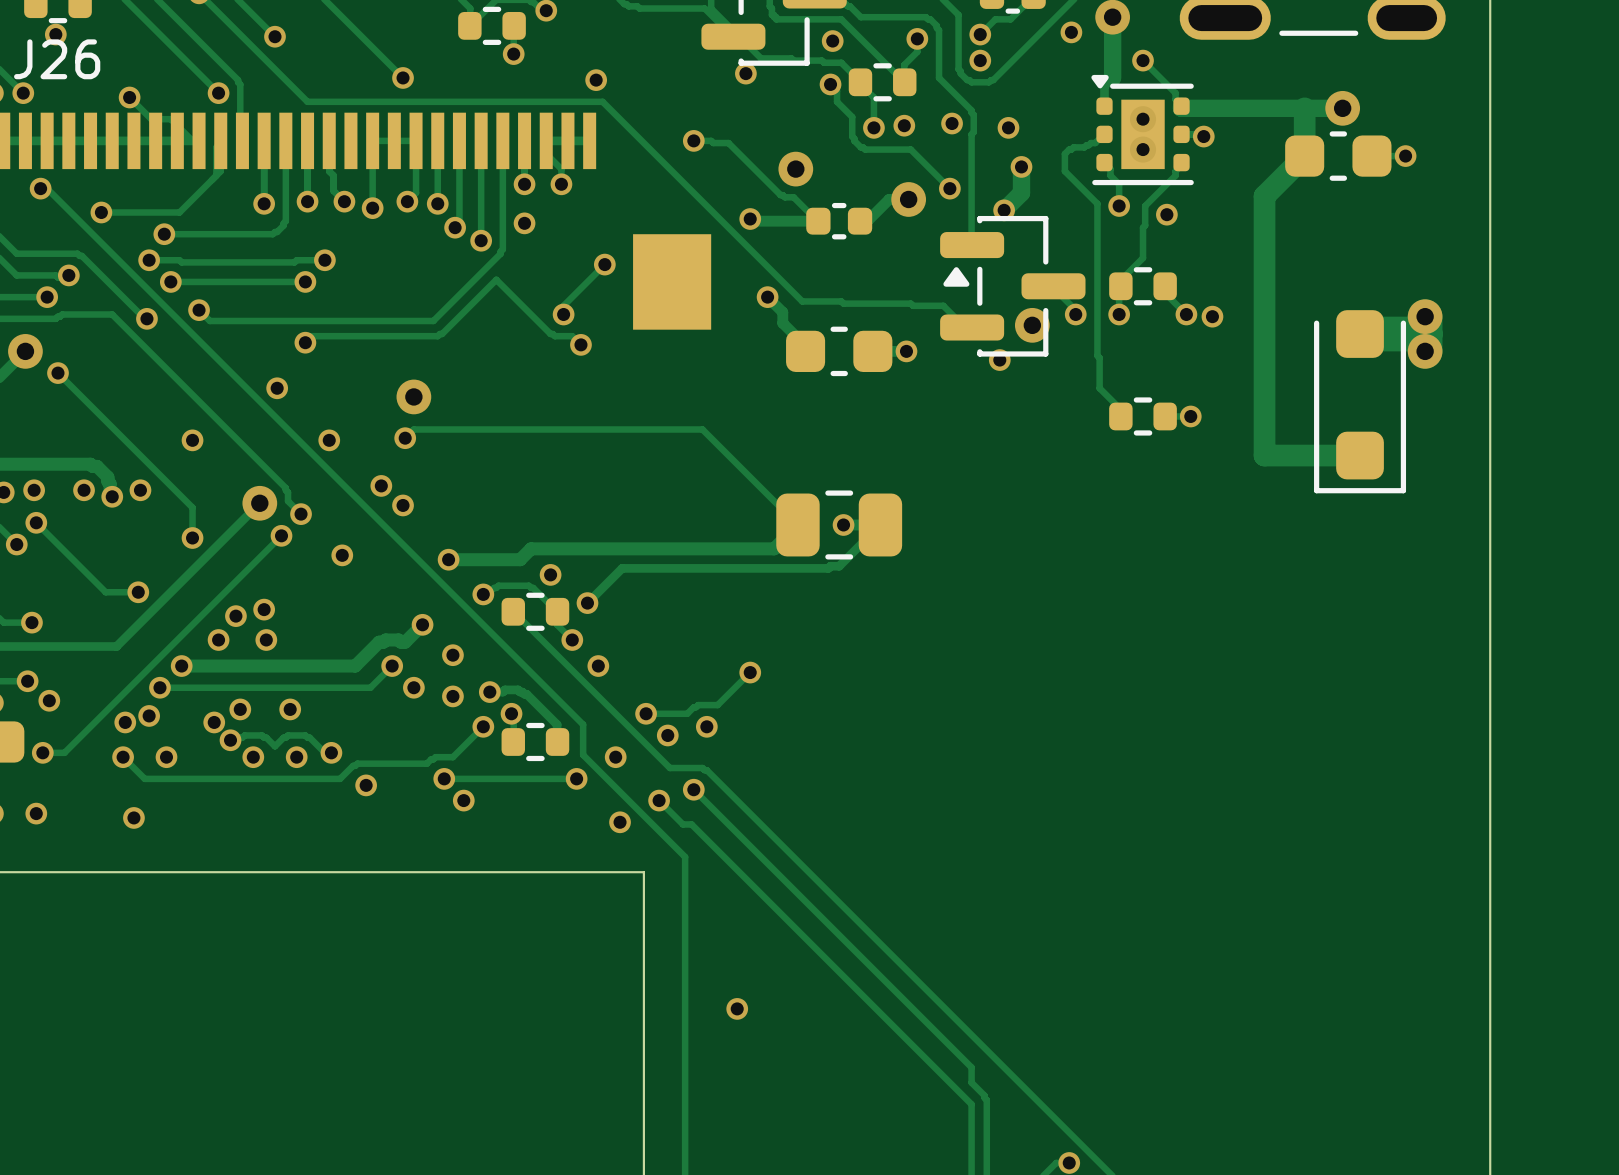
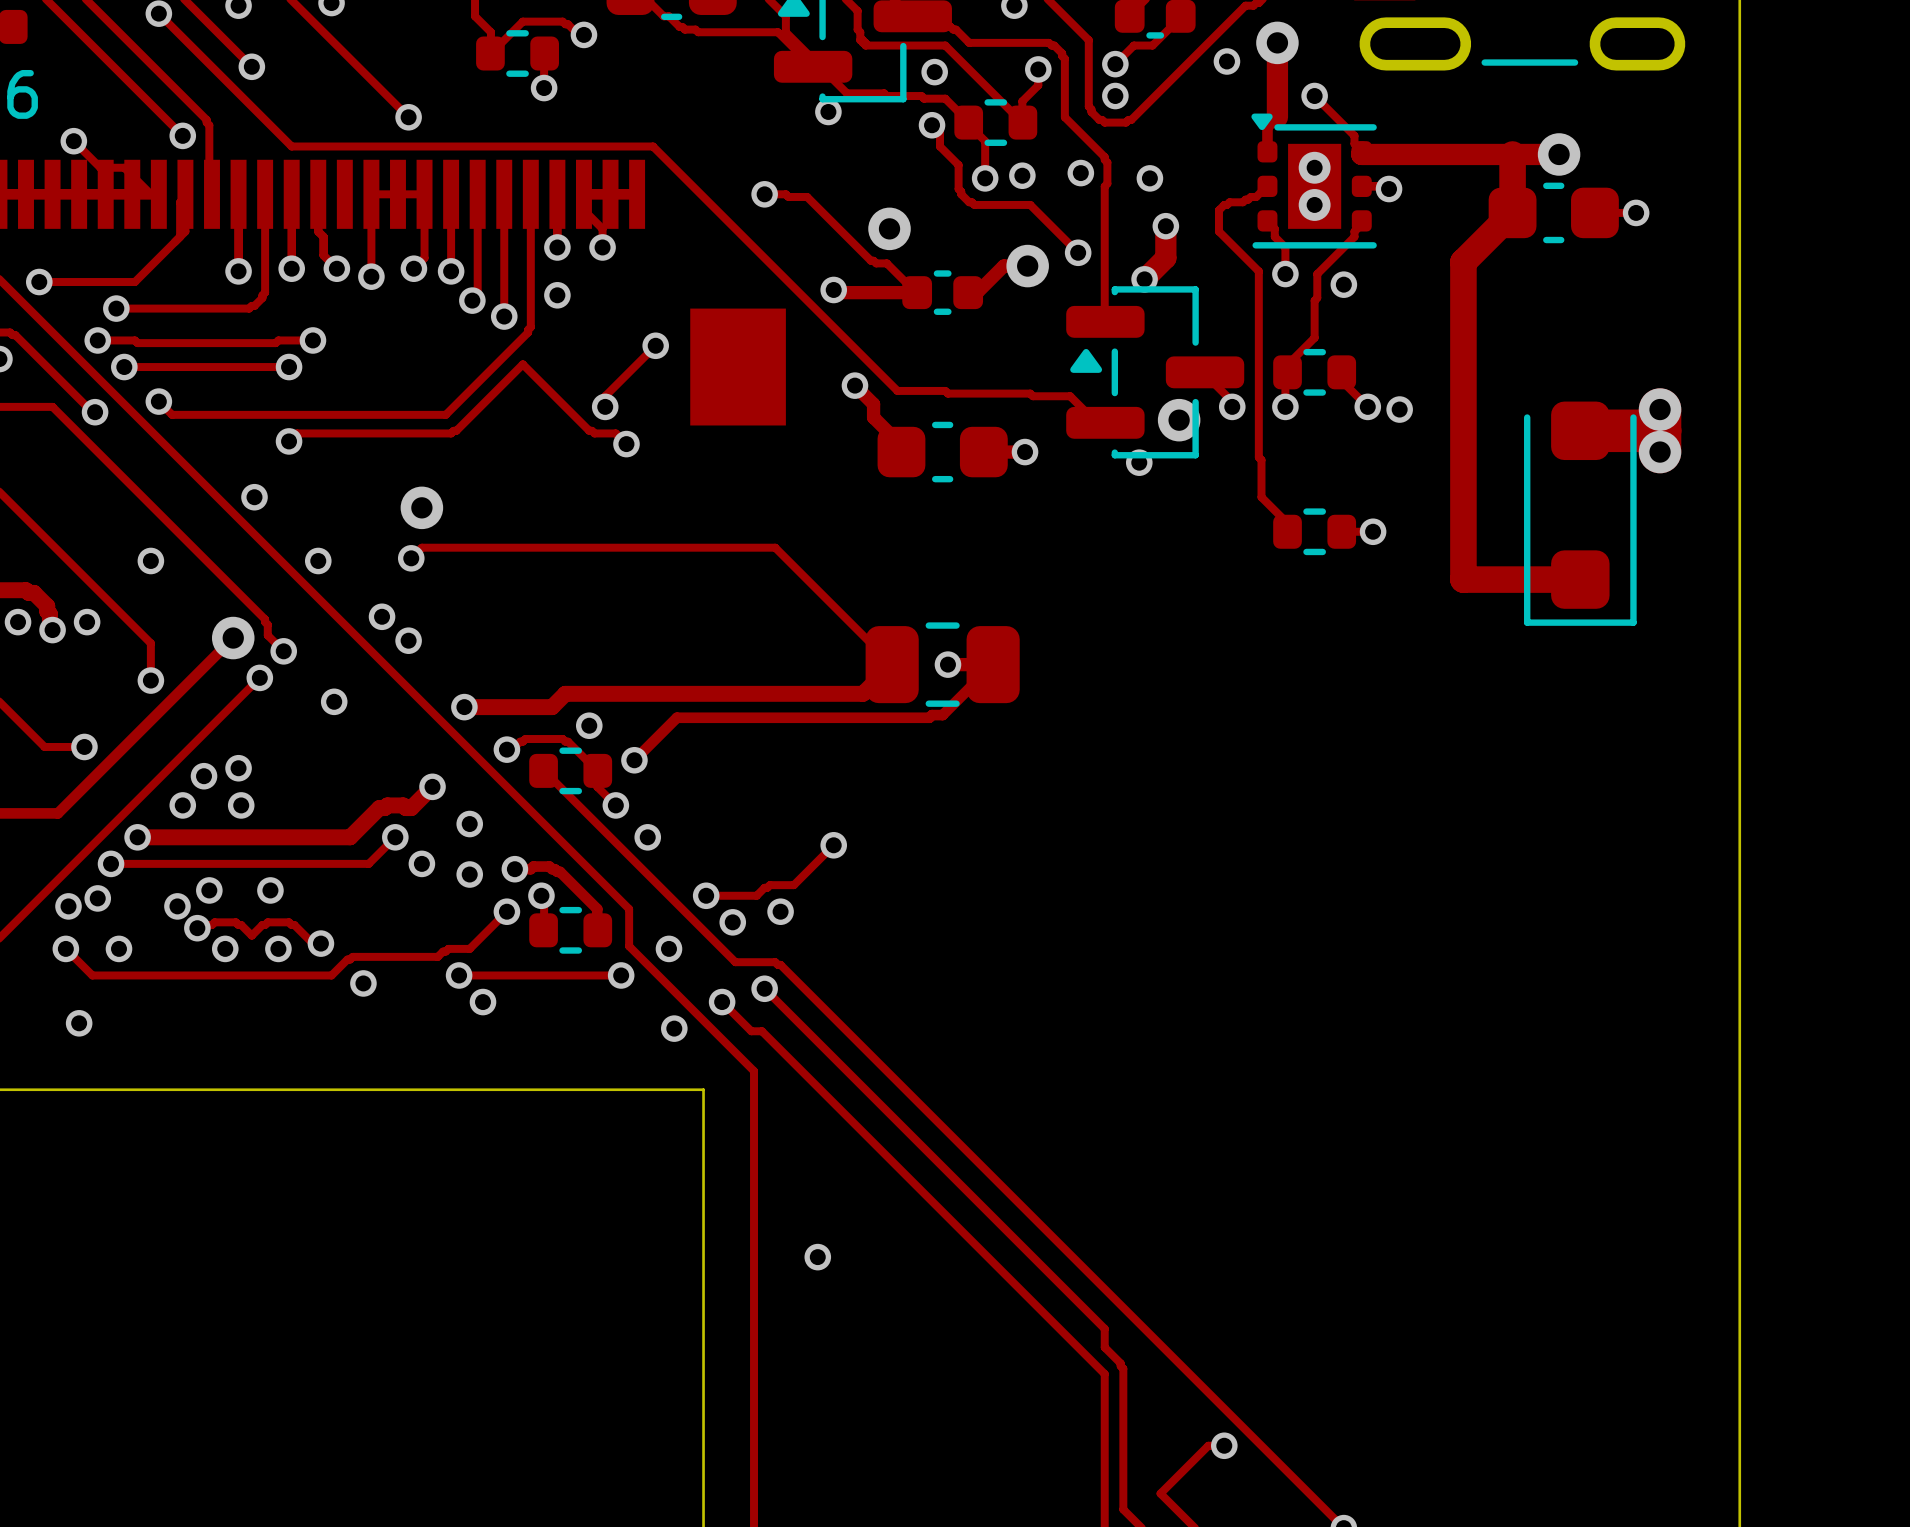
via: (596, 80) -> none

